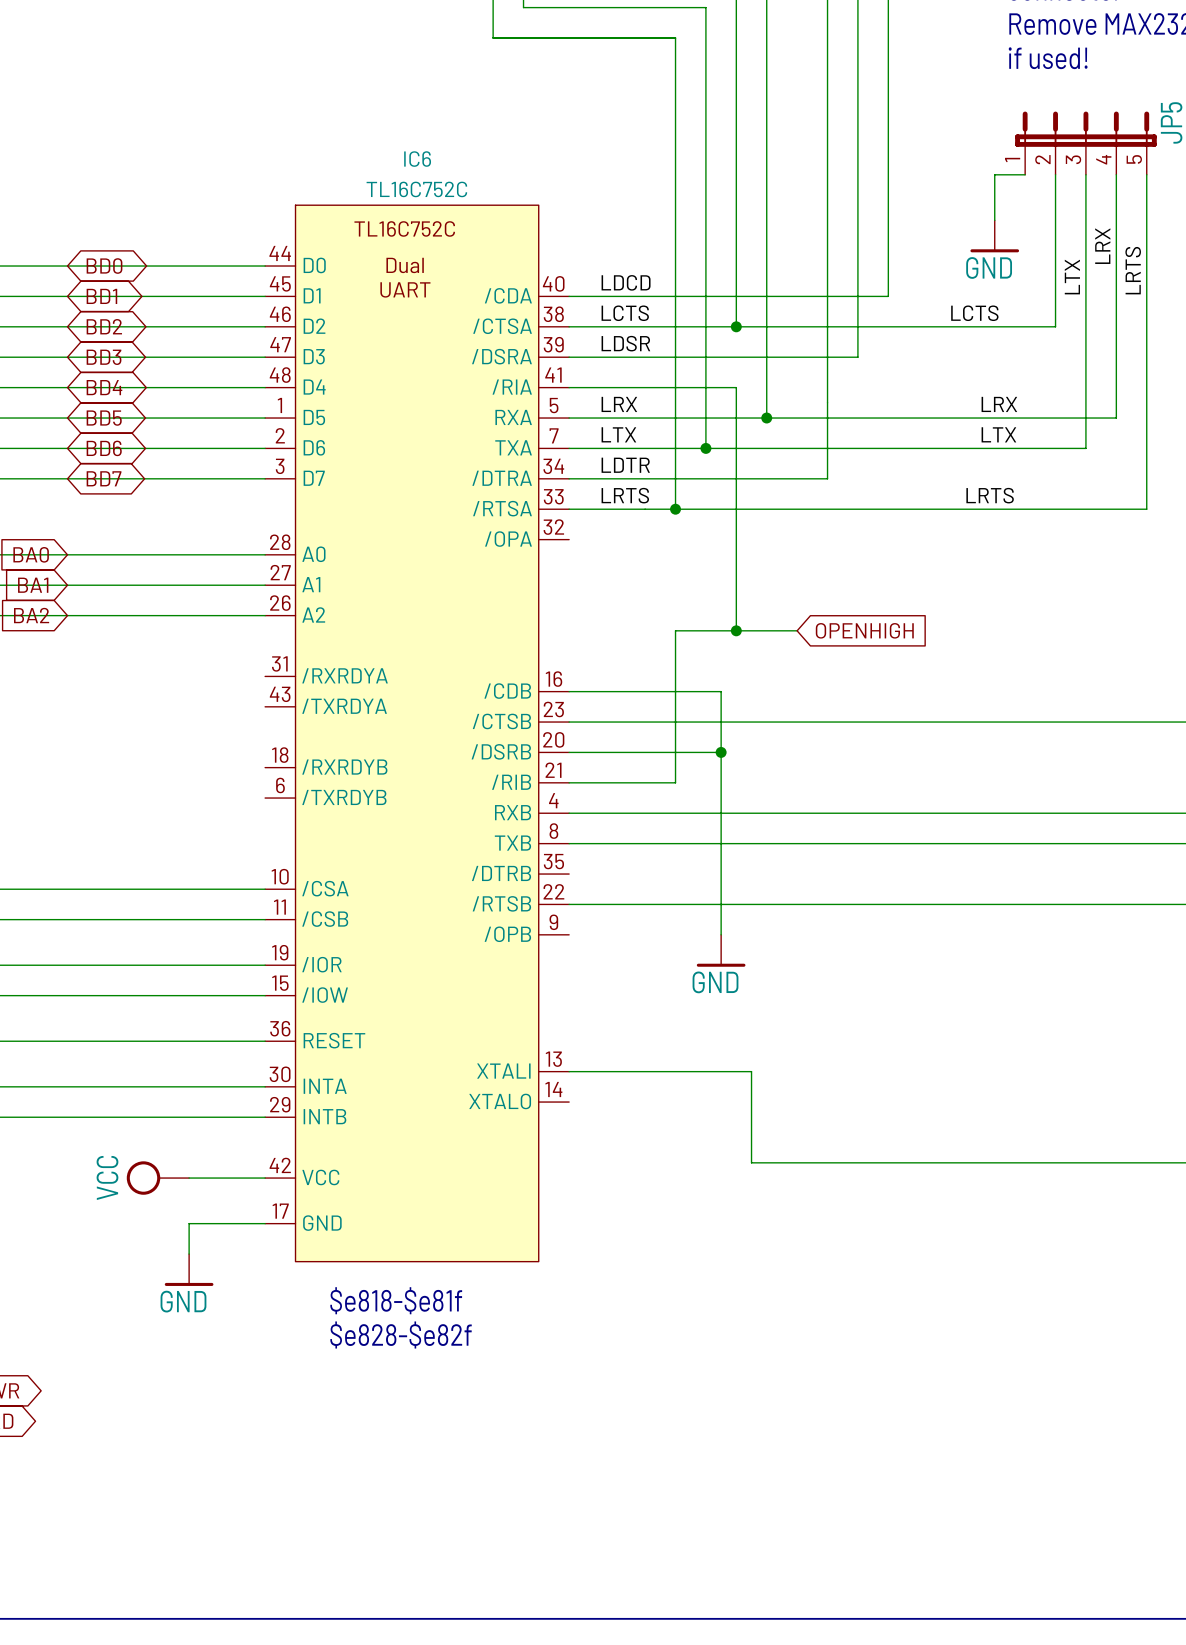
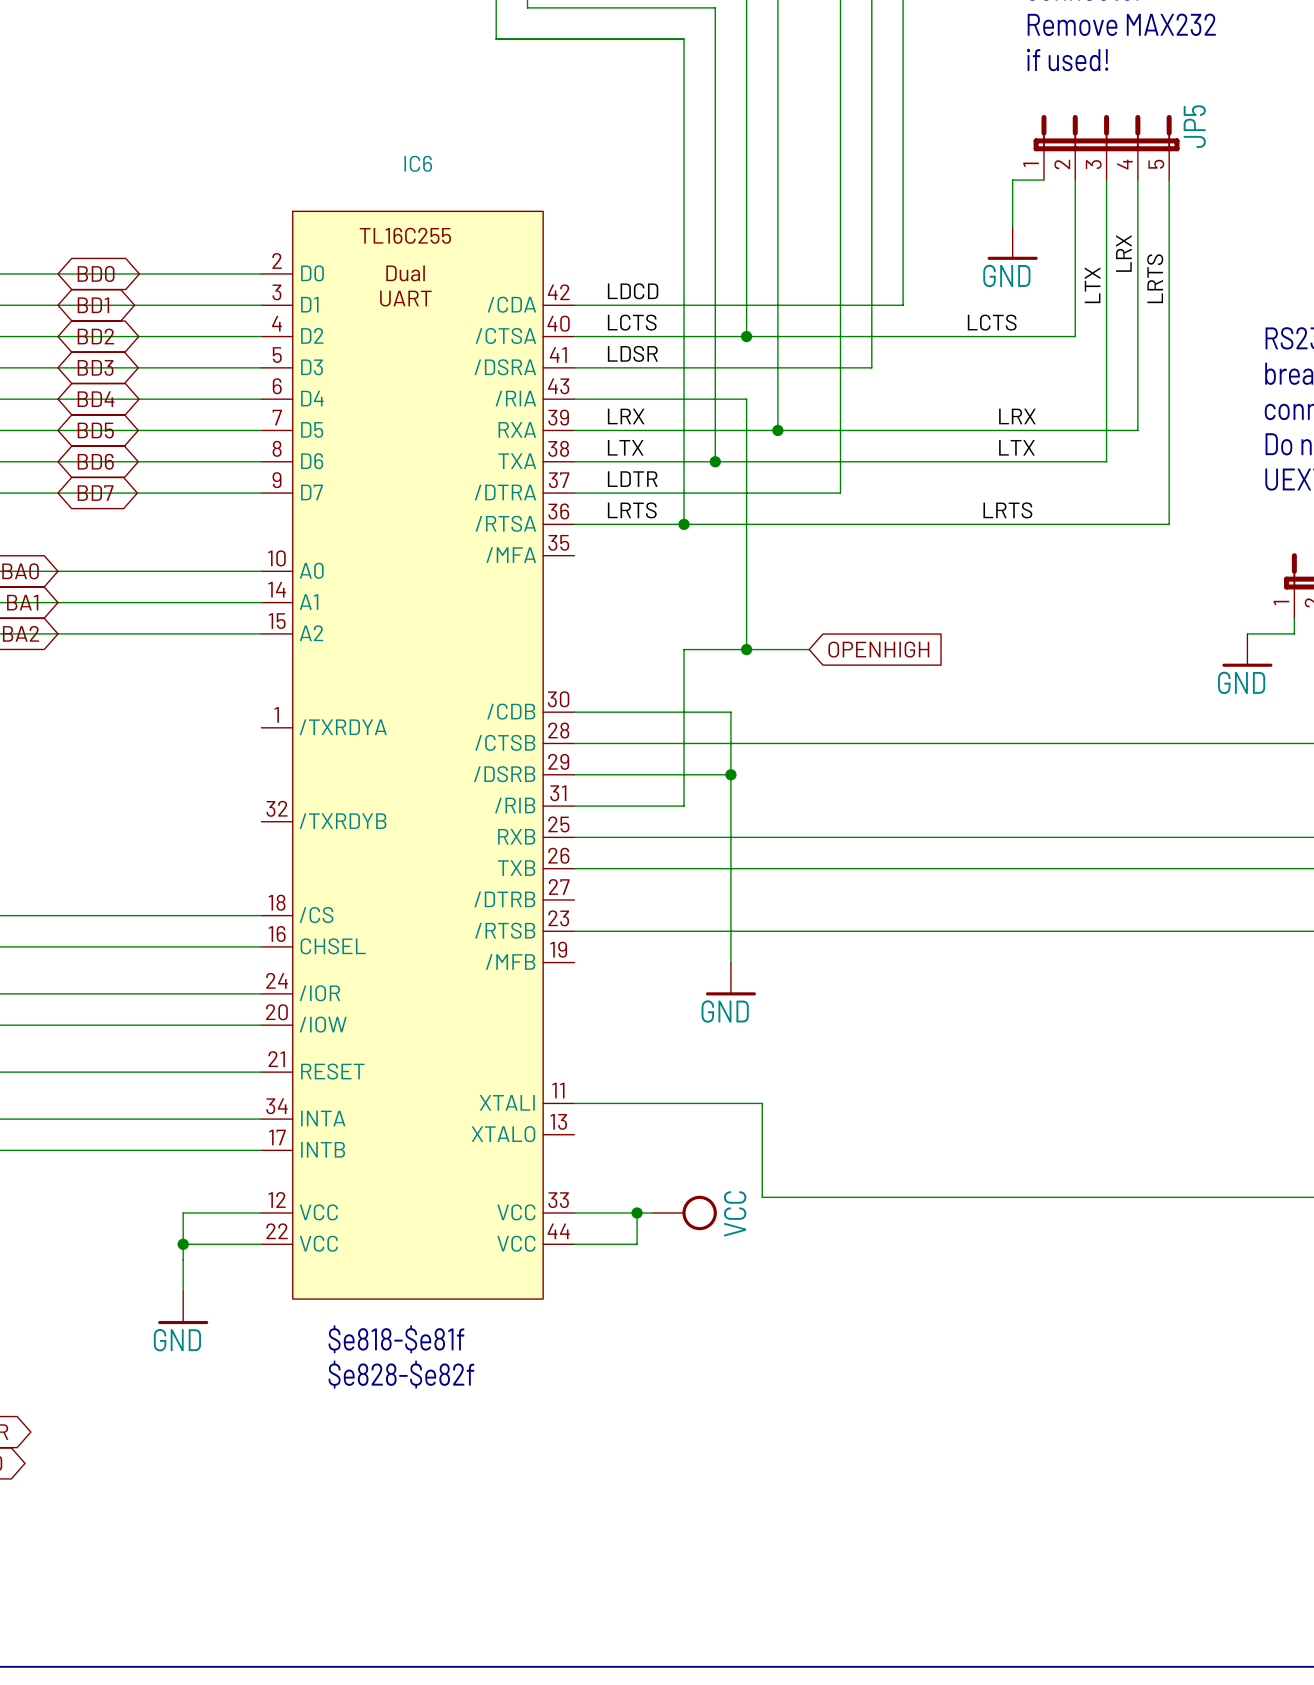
IC6 value: TL16C752C (416, 189) -> none
IC6 symbol: [265, 205, 570, 1262] -> [261, 211, 575, 1300]
power symbol: VCC (157, 1178) -> none
wire: none -> (574, 1212) (652, 1212)
wire: none -> (637, 1212) (637, 1244) (574, 1244)
junction: none -> (637, 1212)
power symbol: none -> VCC (684, 1212)
wire: none -> (183, 1244) (261, 1244)
junction: none -> (183, 1244)
wire: (189, 1223) (265, 1223) -> (183, 1259) (183, 1212)

